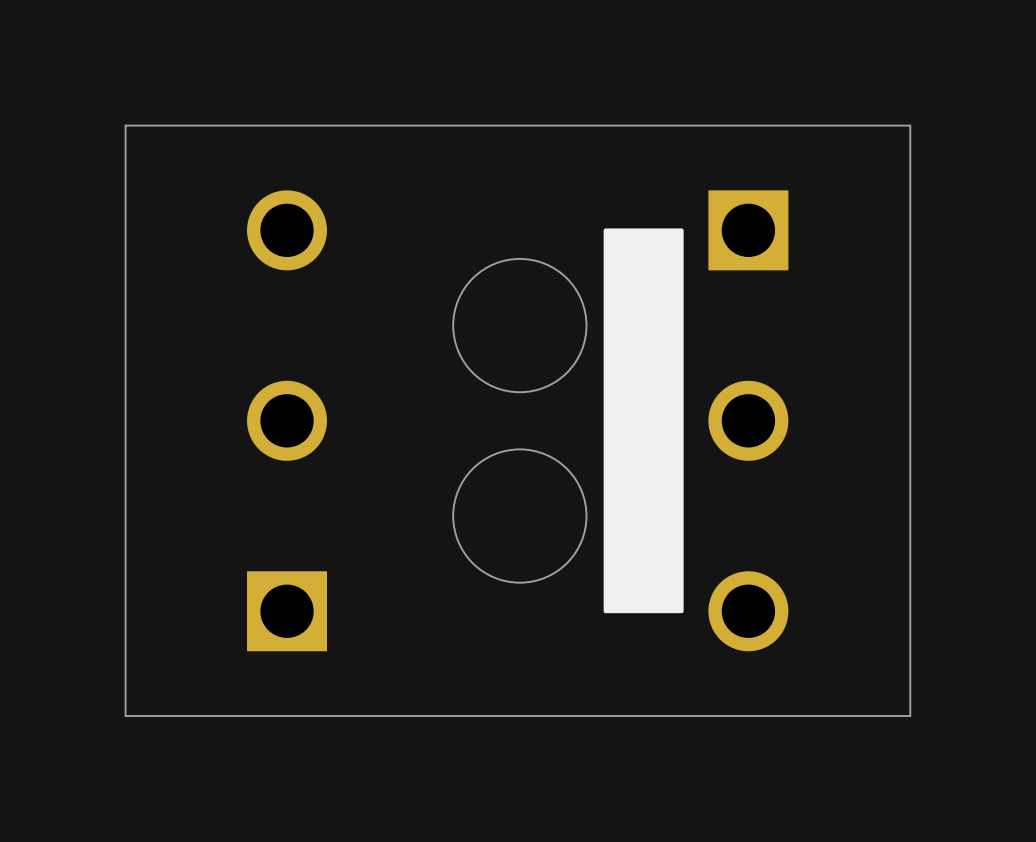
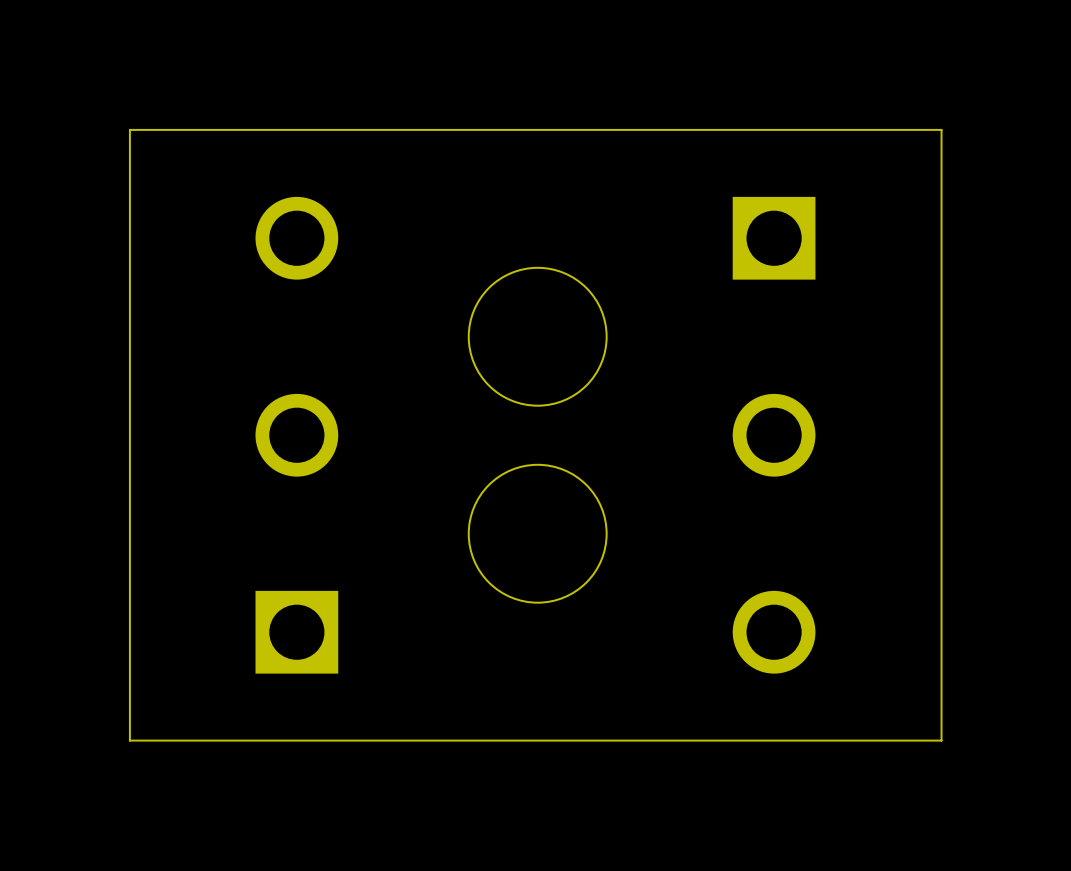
drawing: [603, 228, 684, 614] -> none

